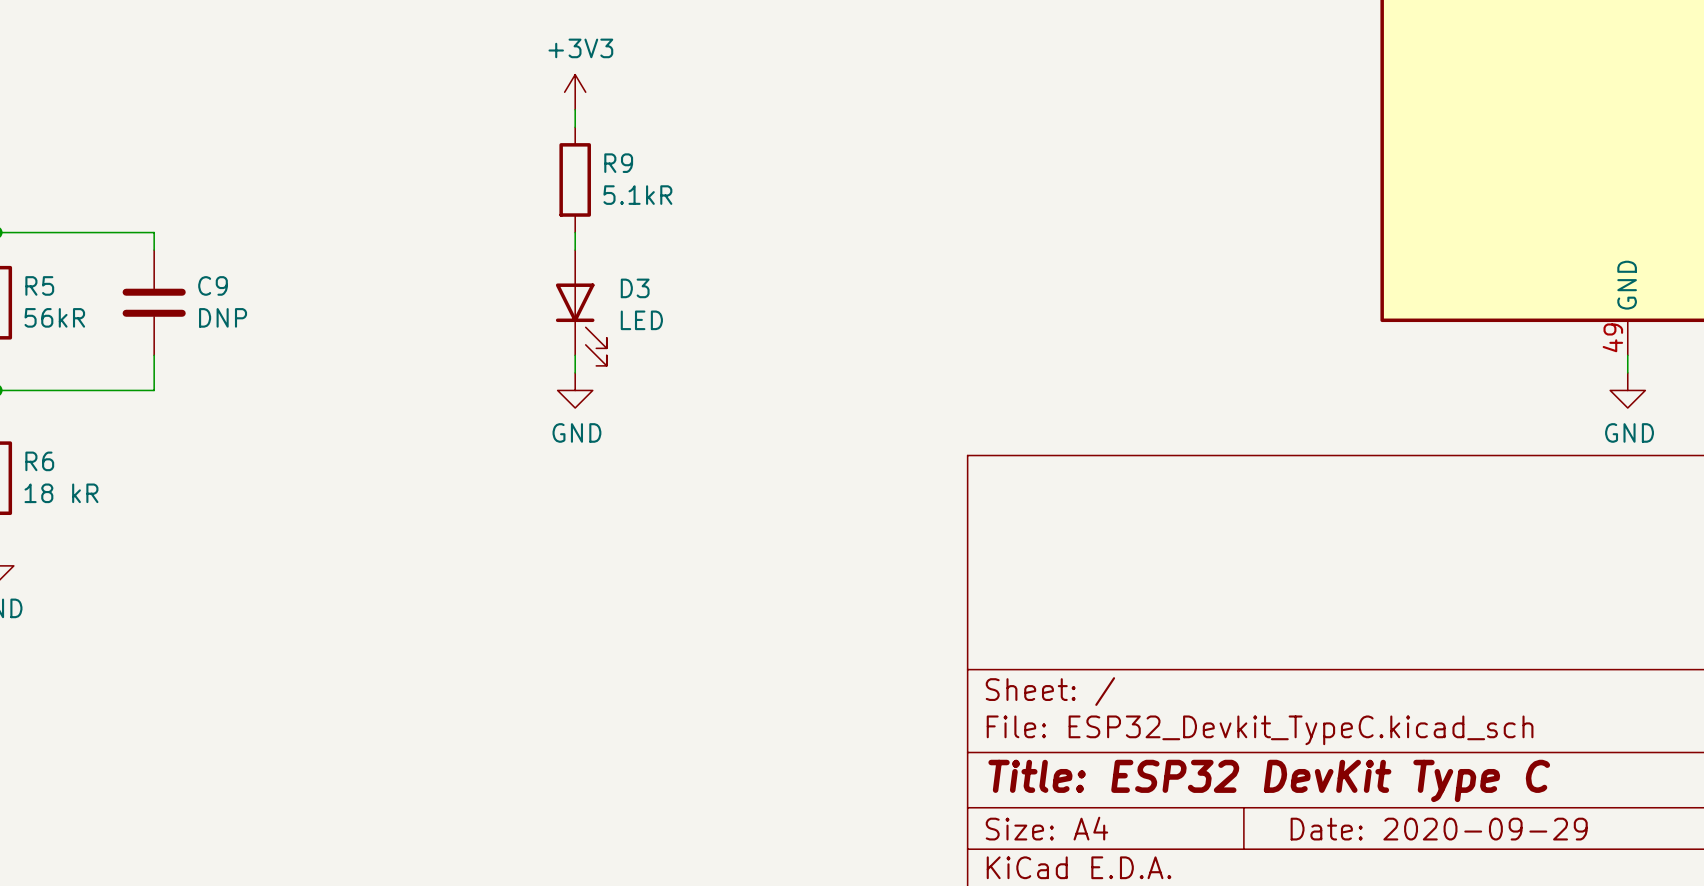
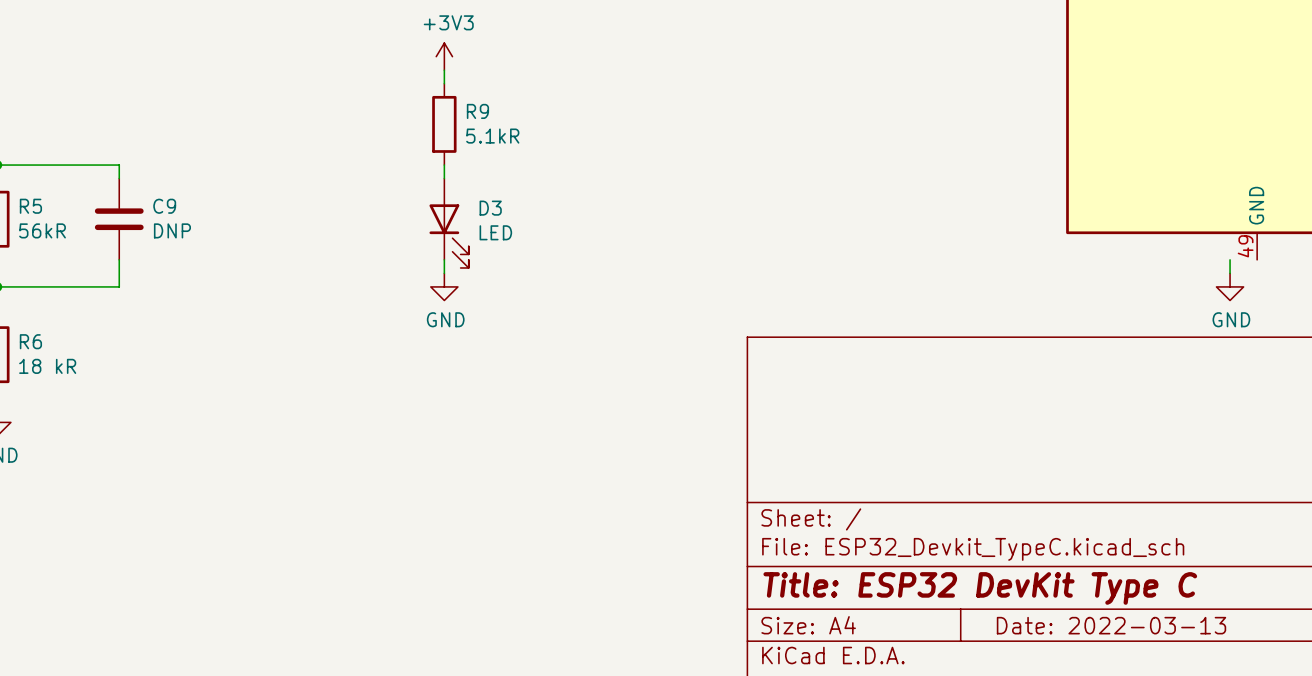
wire: (1627, 355) (1627, 372) -> (1230, 259) (1230, 273)
power symbol position: GND (1627, 390) -> GND (1230, 286)
title block: Date: 2020-09-29 (1439, 829) -> Date: 2022-03-13 (1111, 625)

